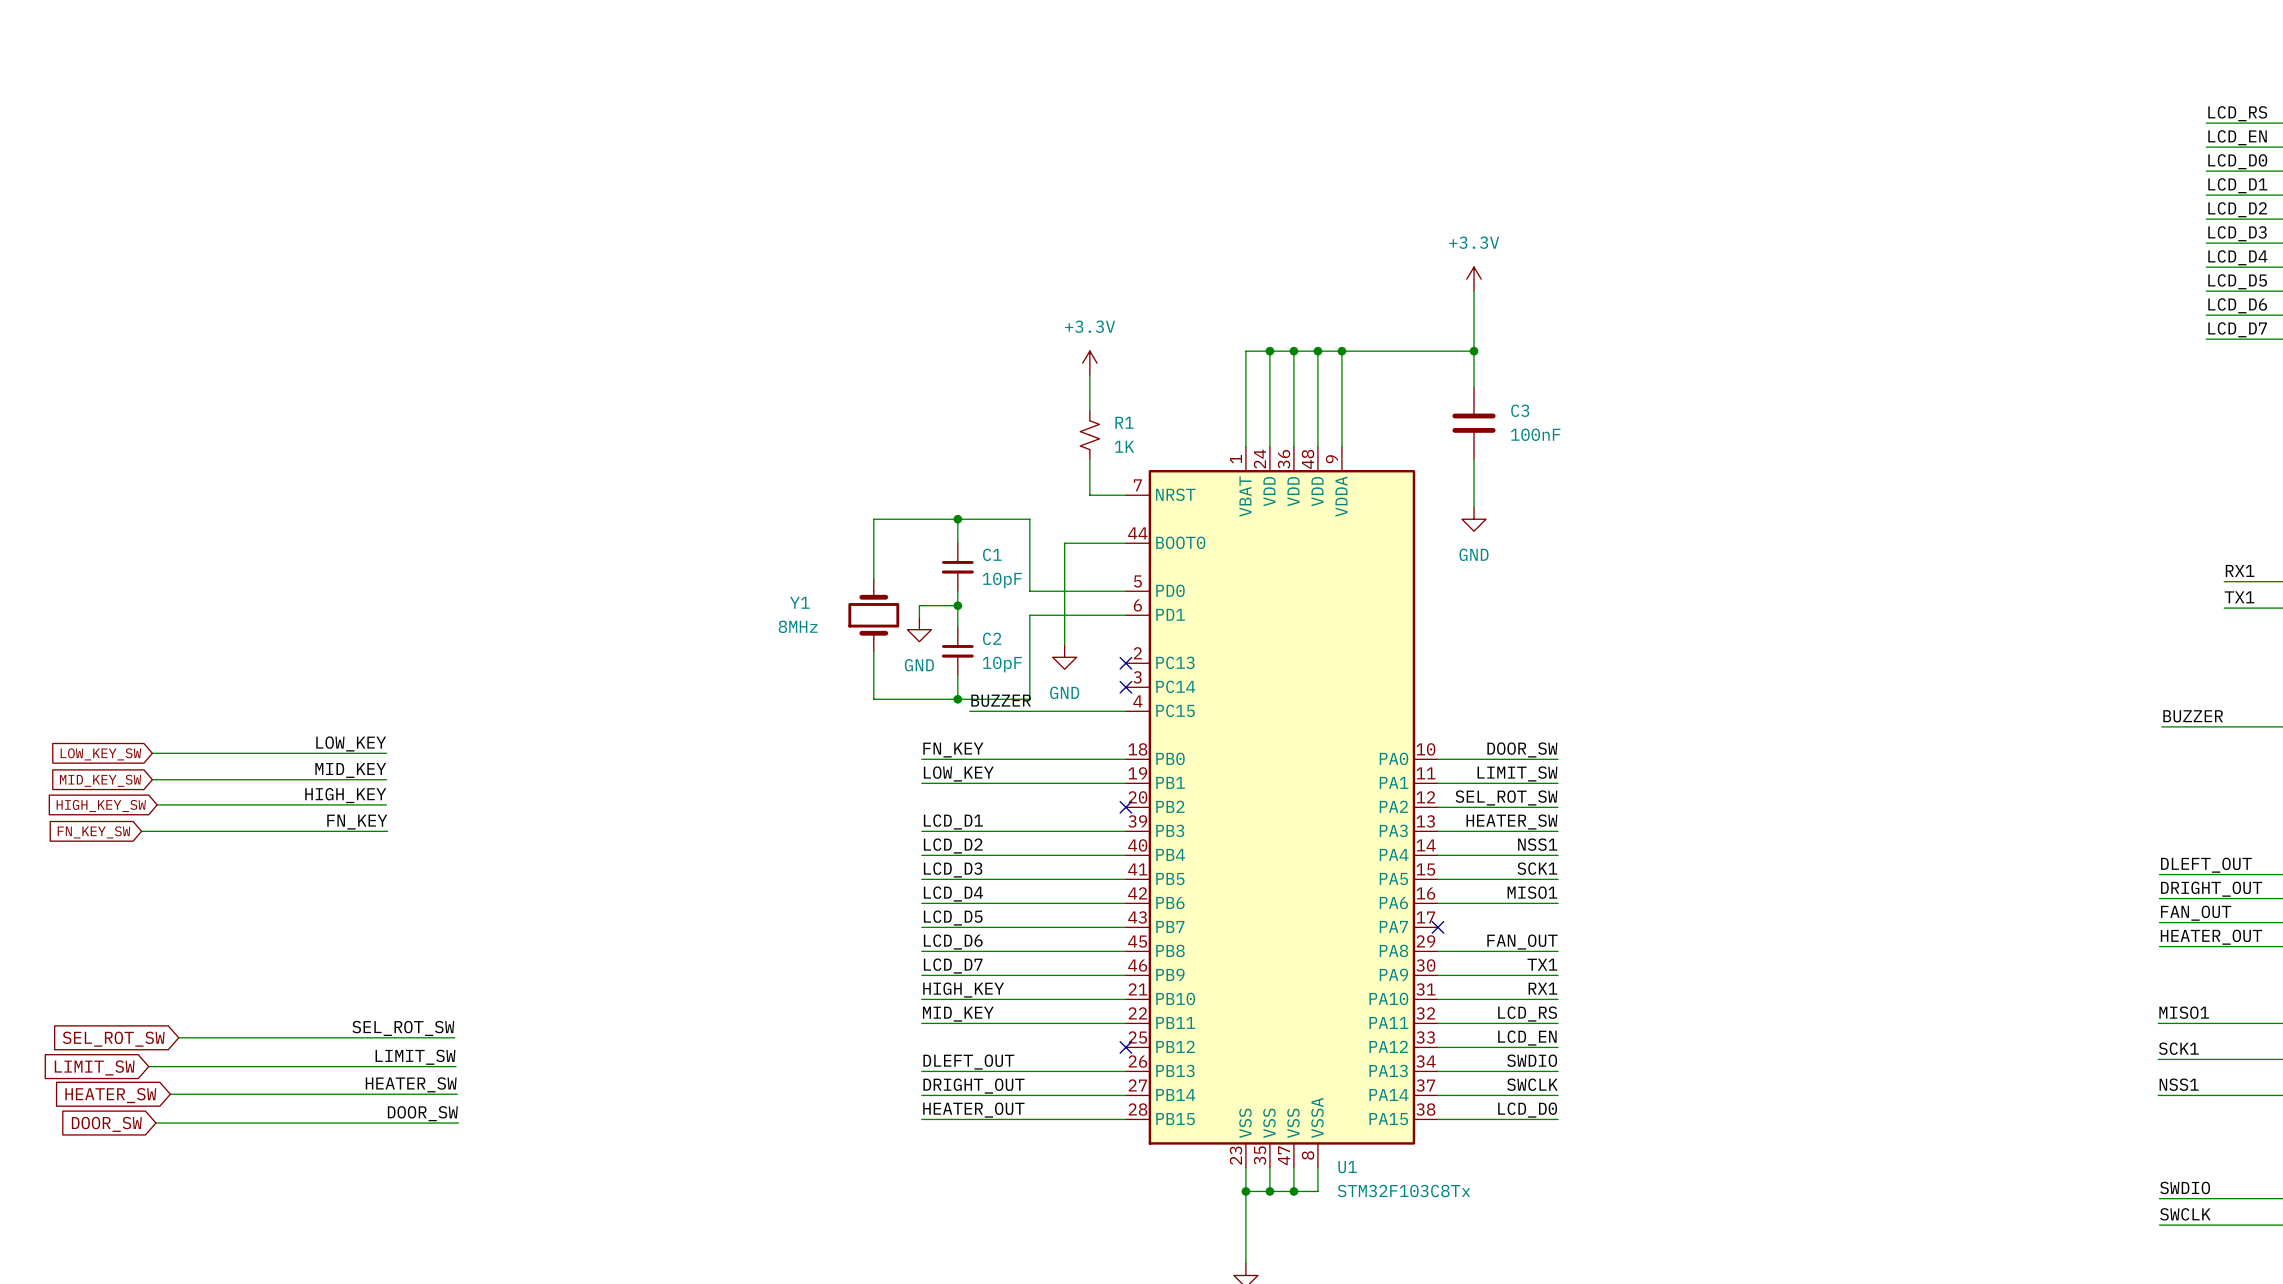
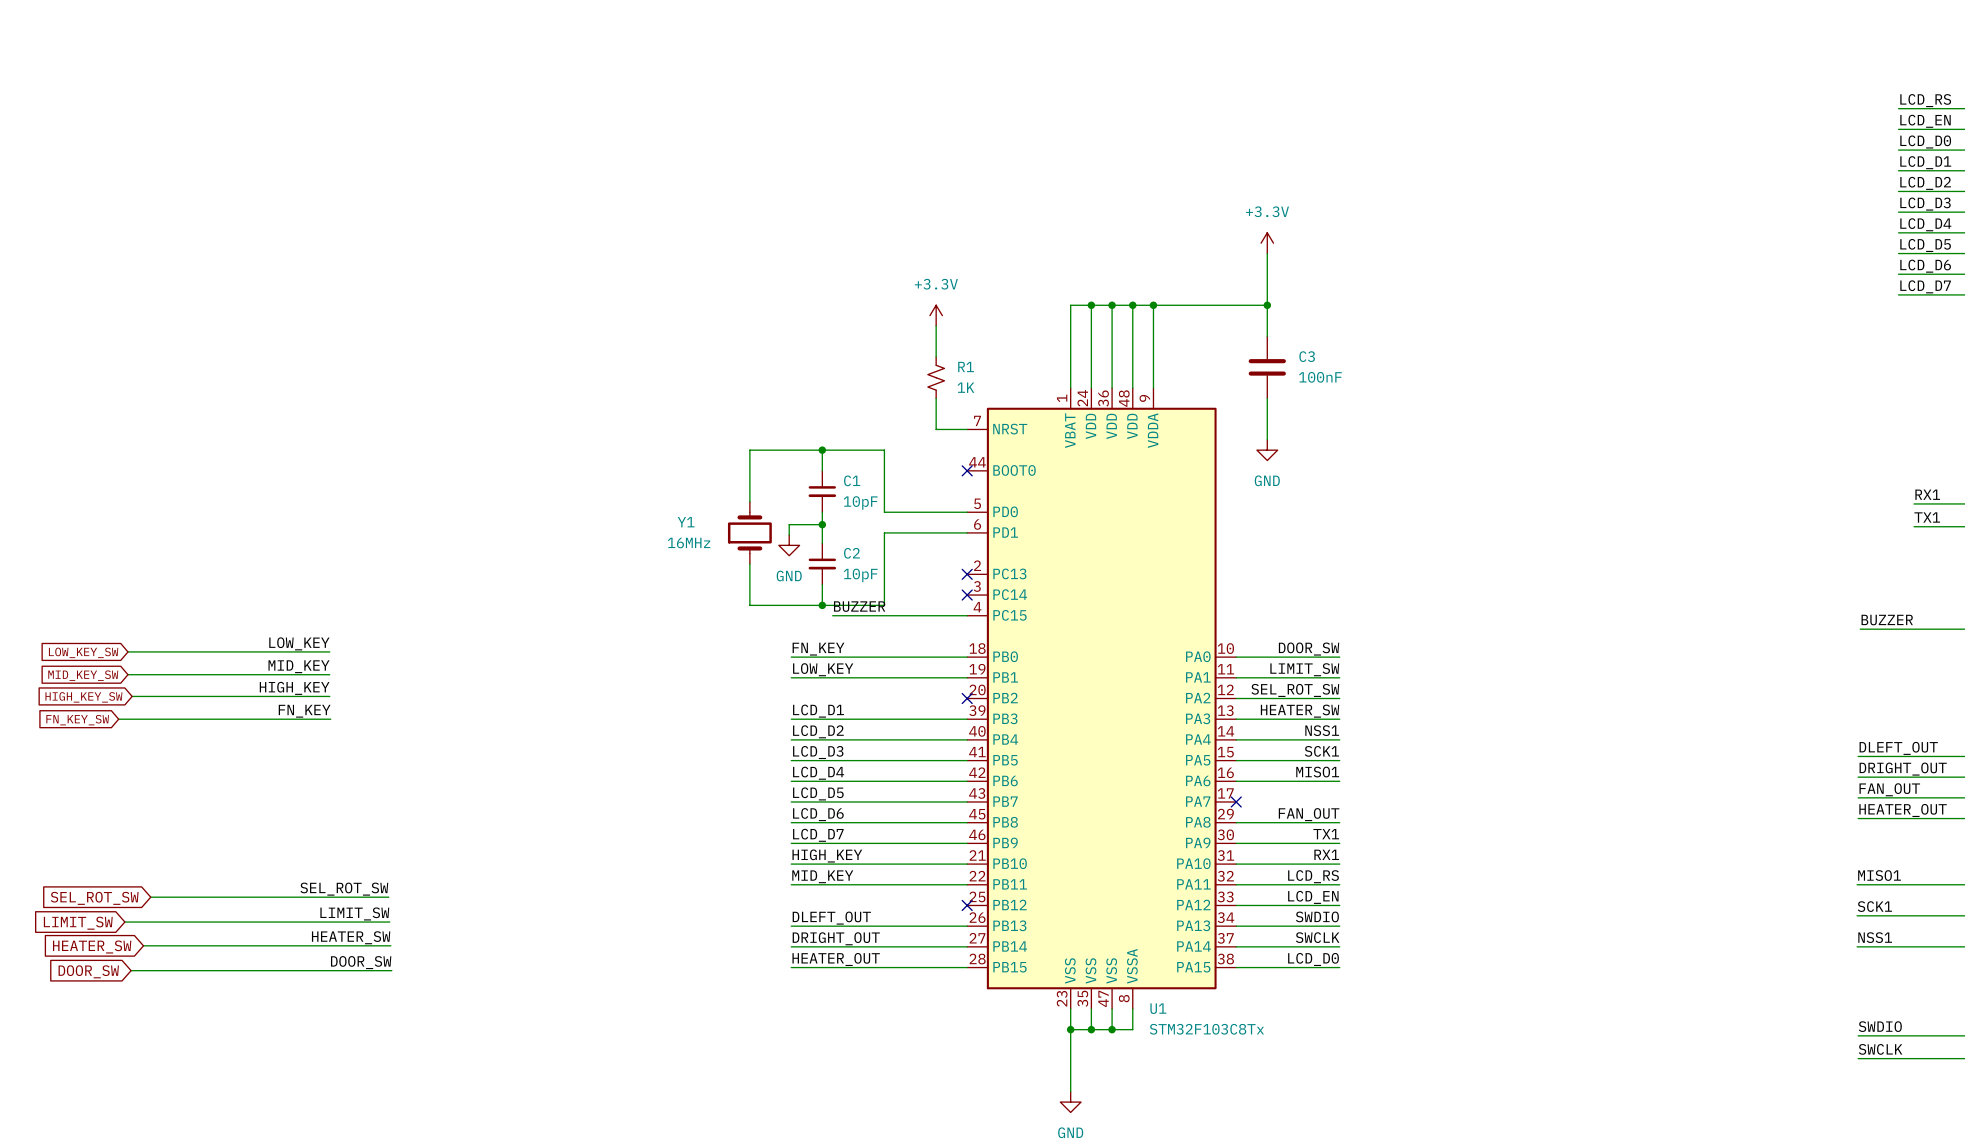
wire: (1125, 543) (1064, 543) (1064, 645) -> none
no-connect mark: none -> (967, 470)
Y1 value: 8MHz (798, 626) -> 16MHz (689, 542)
power symbol: GND (1064, 657) -> none

